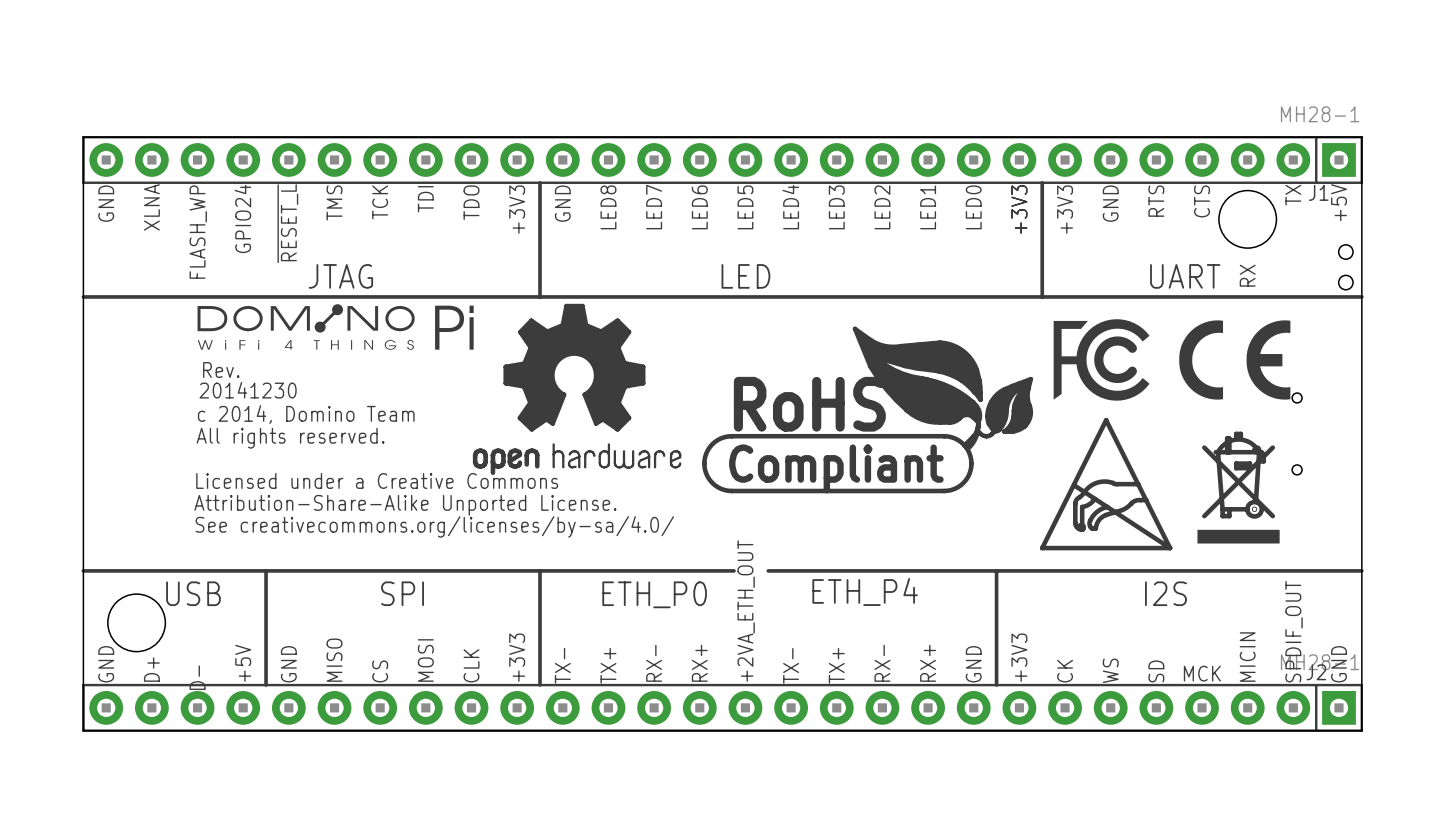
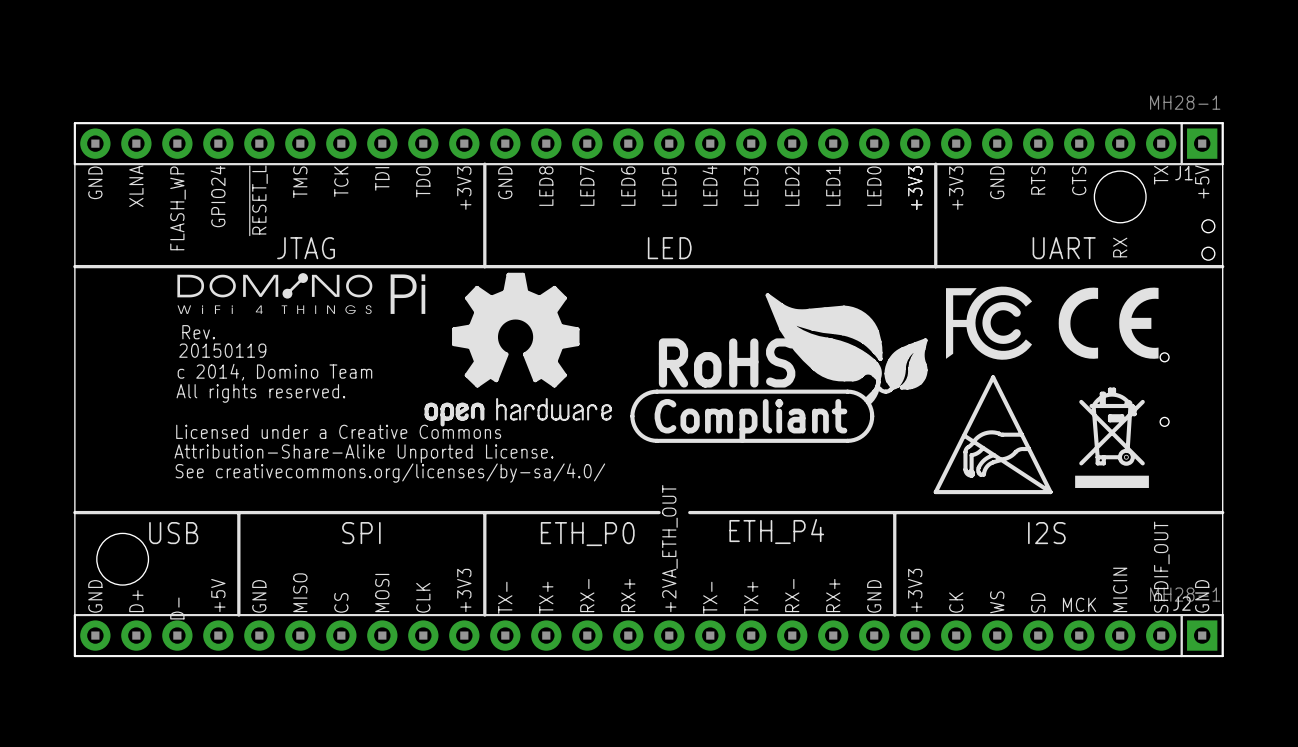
text: 20141230 (248, 390) -> 20150119 (222, 350)

